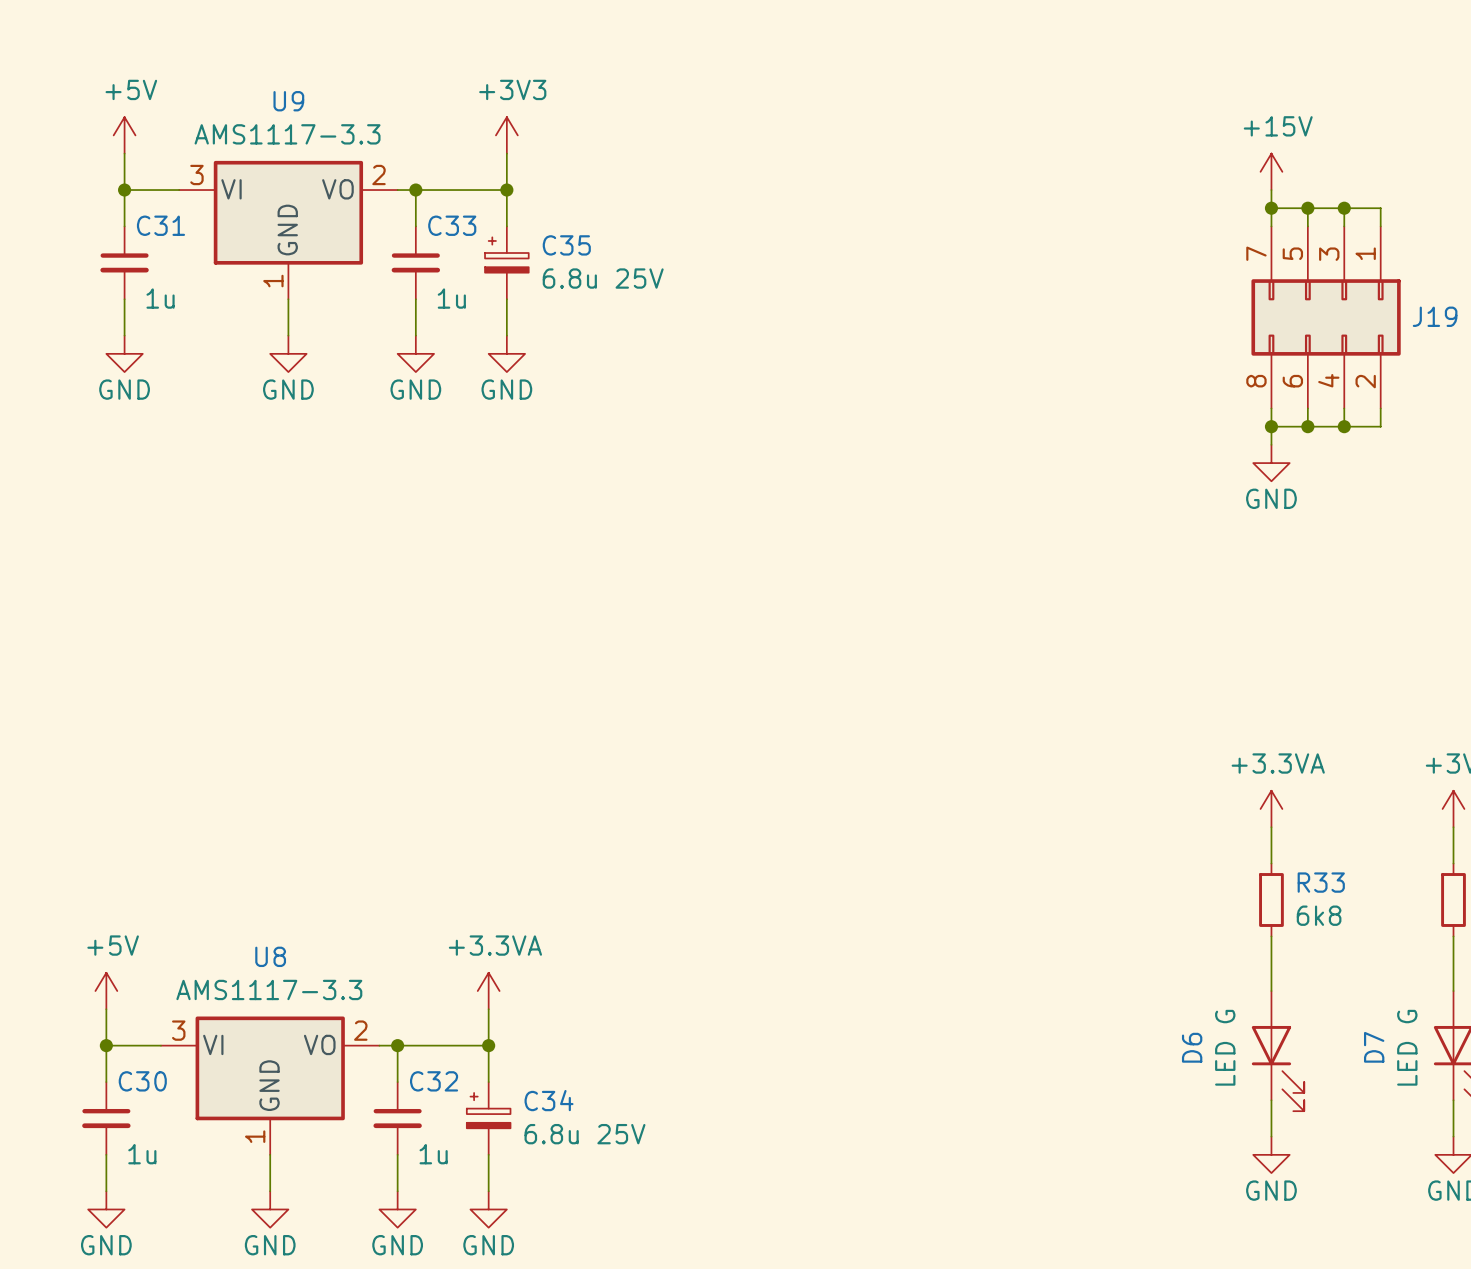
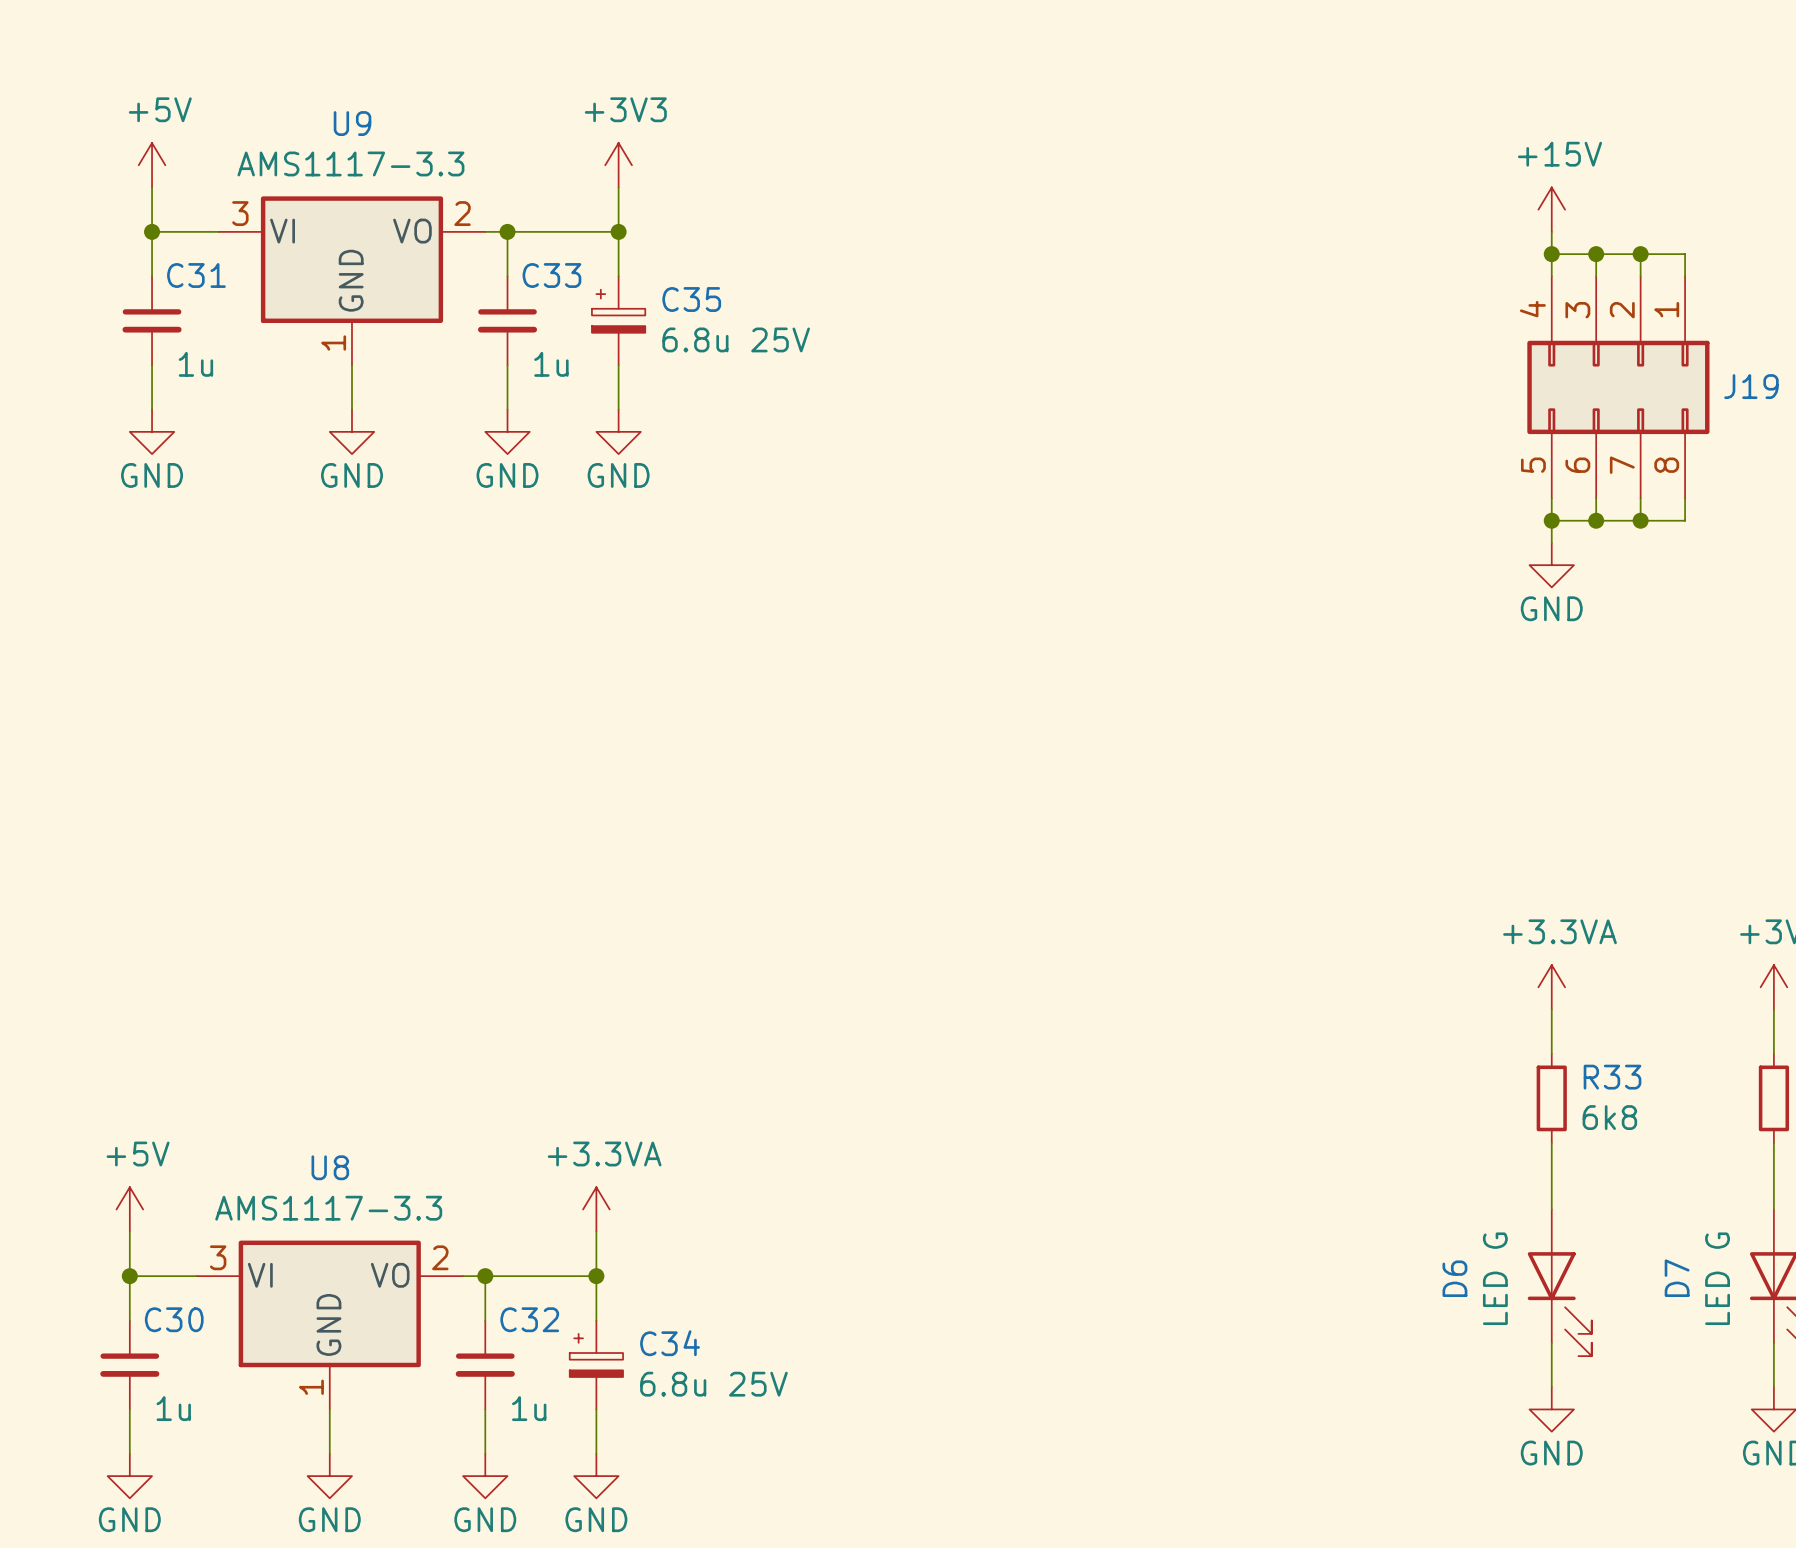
J19 pin number: 7 (1256, 253) -> 4 (1532, 309)
J19 pin number: 5 (1292, 253) -> 3 (1577, 310)
J19 pin number: 3 (1329, 254) -> 2 (1622, 310)
J19 pin number: 4 (1328, 380) -> 7 (1622, 465)
J19 pin number: 8 (1256, 381) -> 5 (1533, 465)
J19 pin number: 2 (1365, 381) -> 8 (1666, 465)

